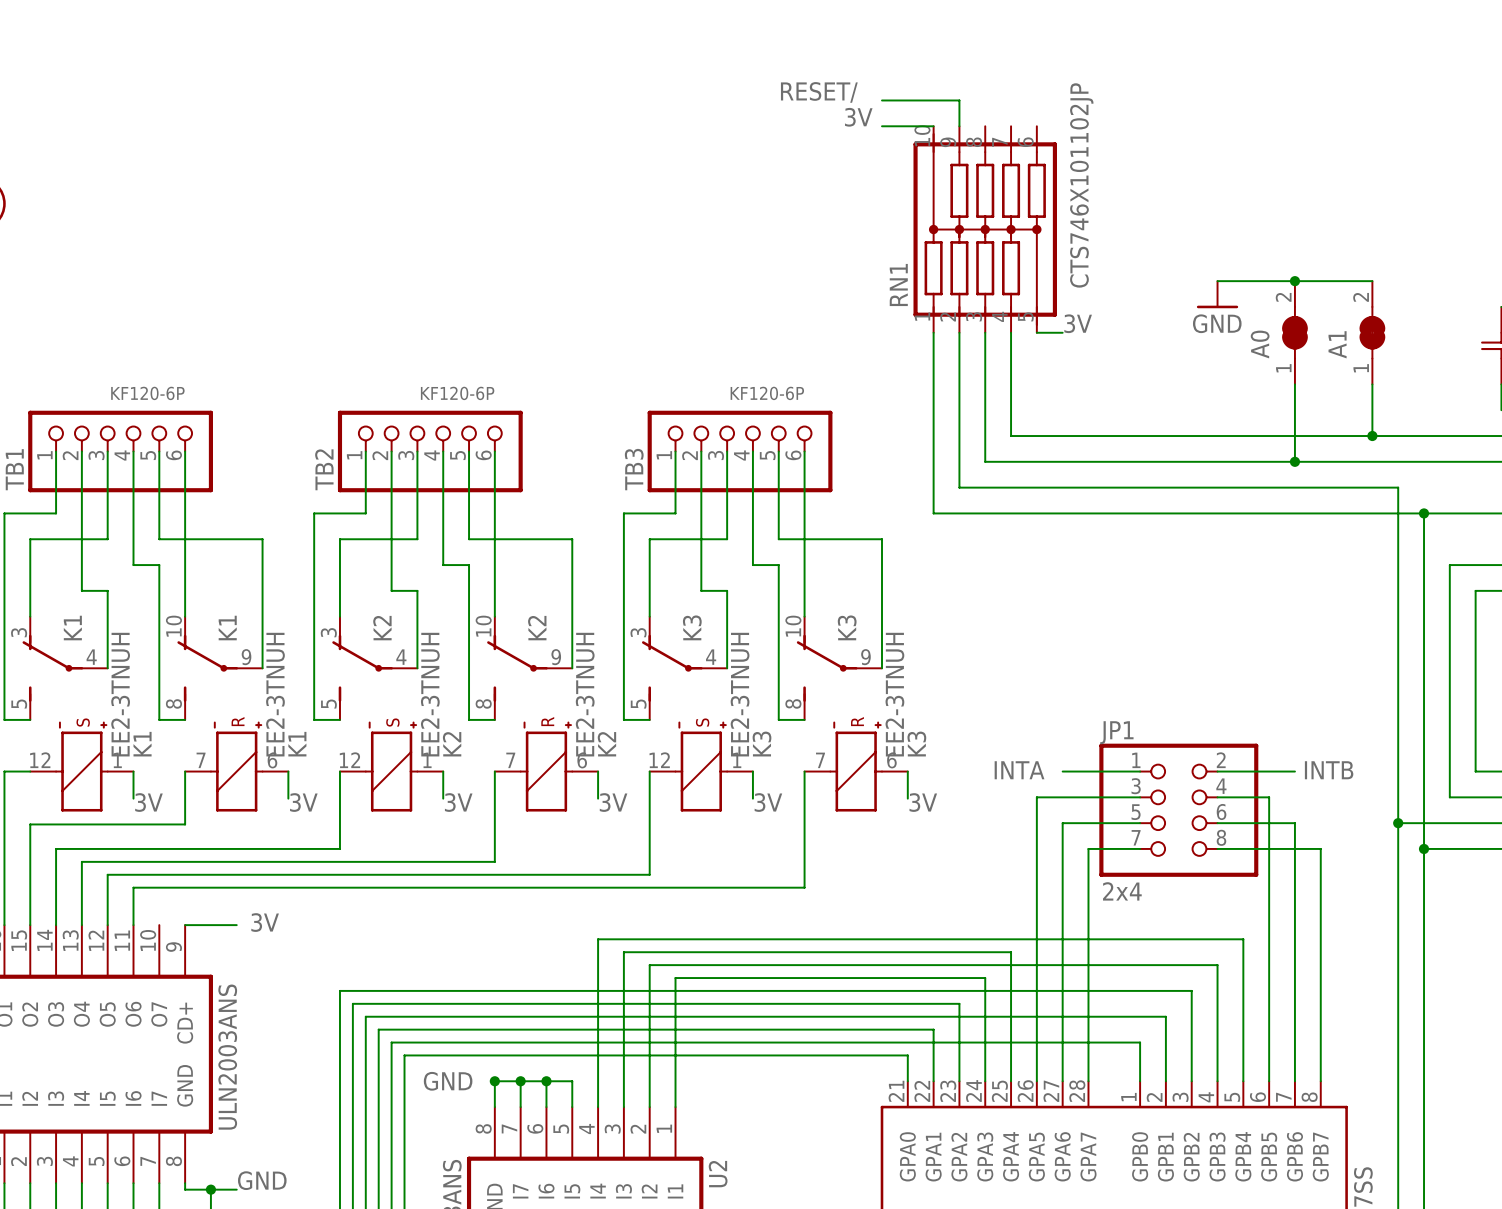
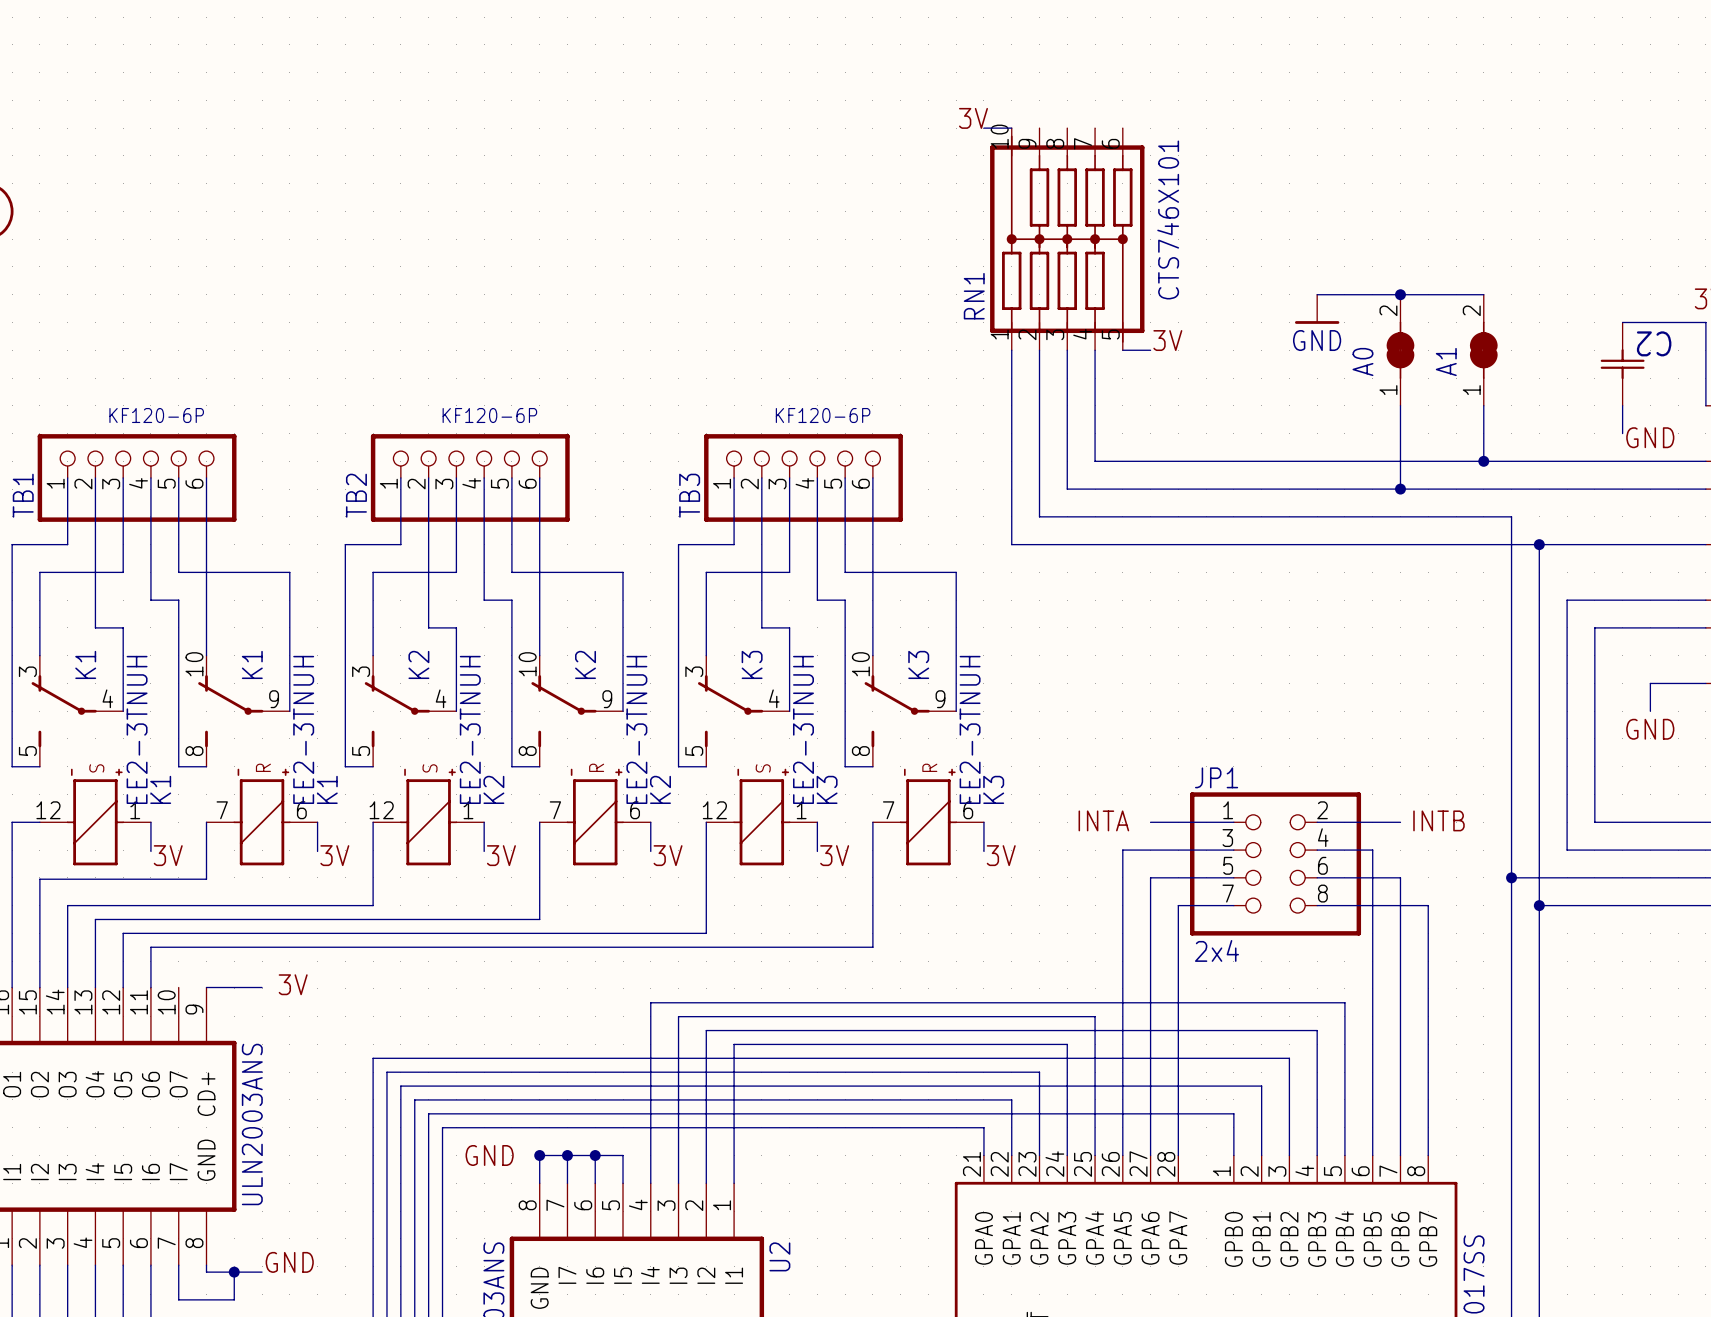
label: RESET/ (819, 92) -> none
wire: (882, 100) (959, 100) (959, 126) -> none
label position: 3V (858, 117) -> 3V (973, 118)
wire: (882, 126) (907, 126) -> none
RN1 value: CTS746X101102JP (1081, 185) -> CTS746X101 (1168, 219)

